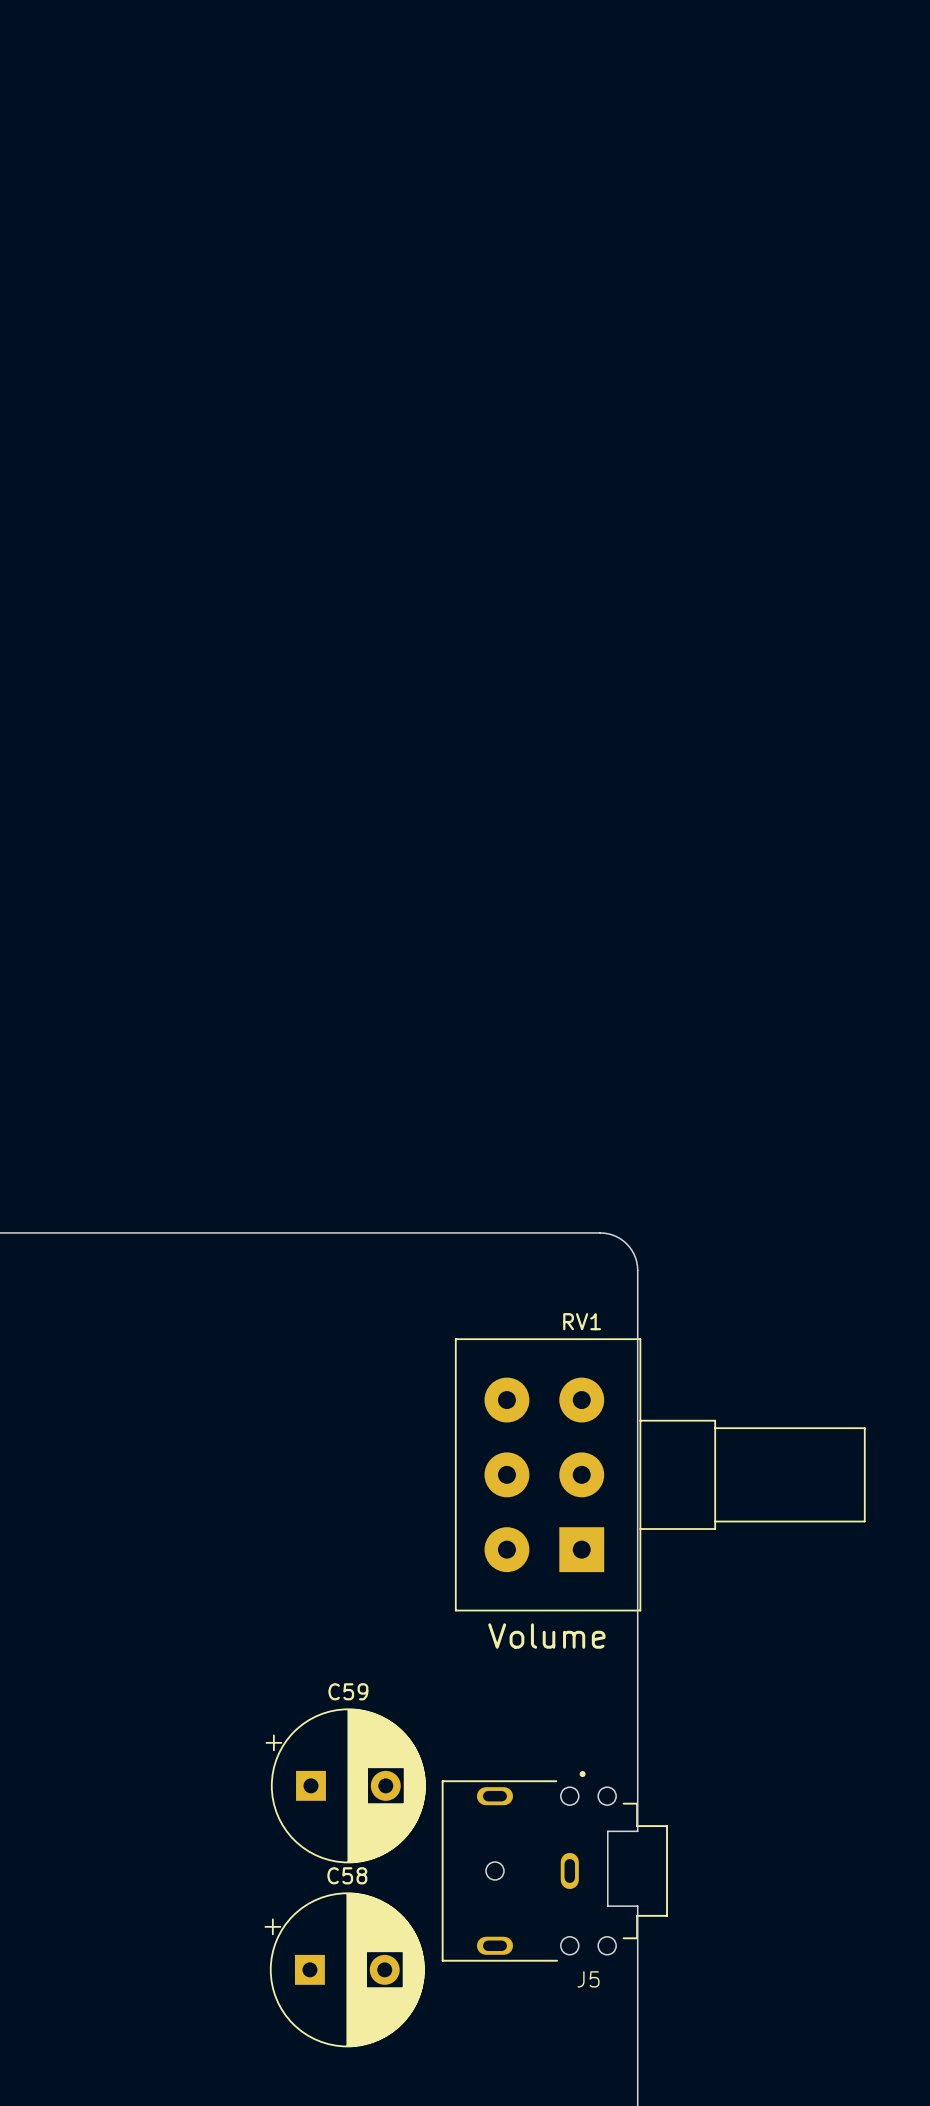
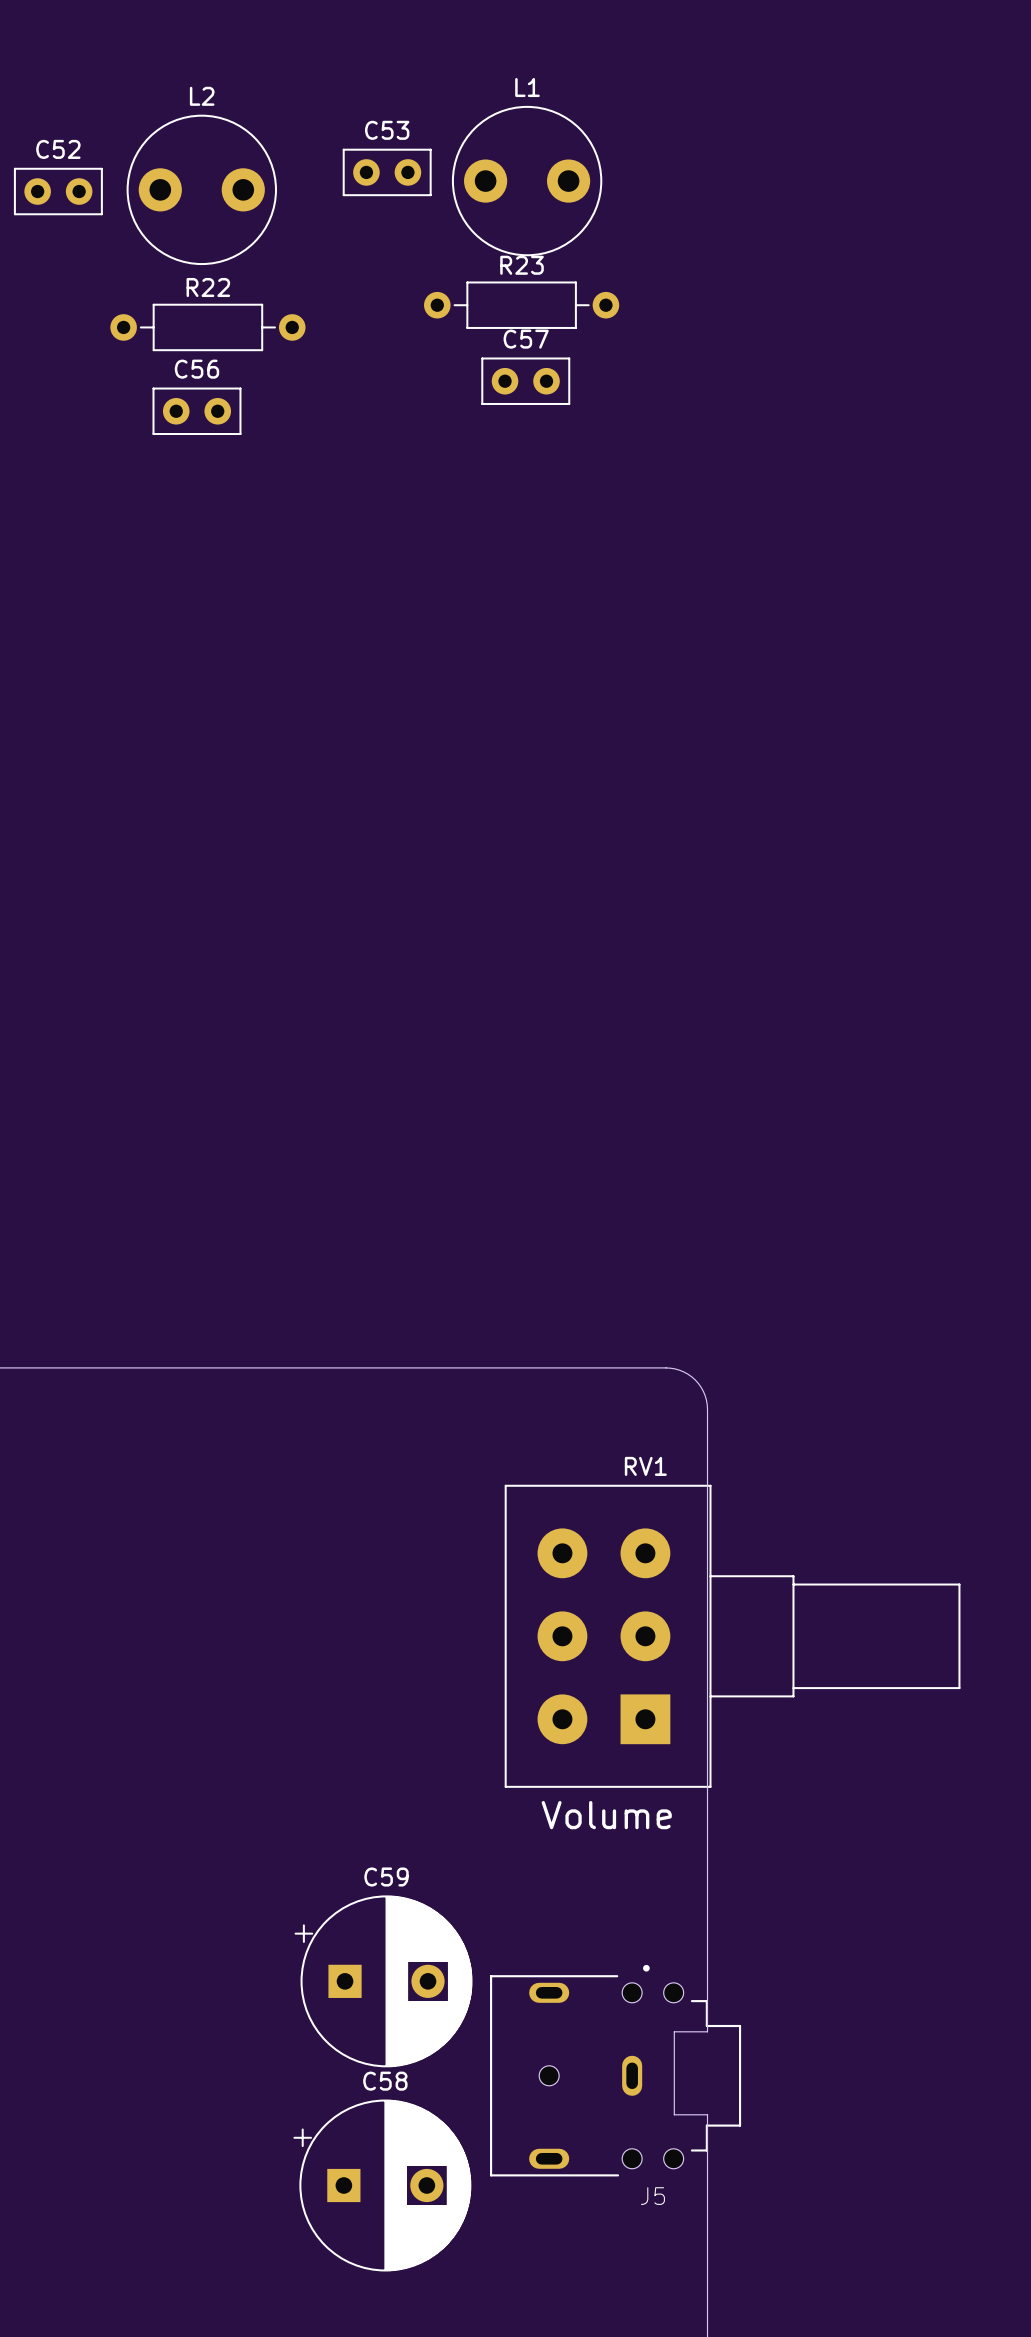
C53: none -> (387, 172)
L1: none -> (527, 181)
L2: none -> (201, 189)
C52: none -> (58, 191)
R23: none -> (521, 305)
R22: none -> (207, 327)
C57: none -> (525, 381)
C56: none -> (196, 411)

